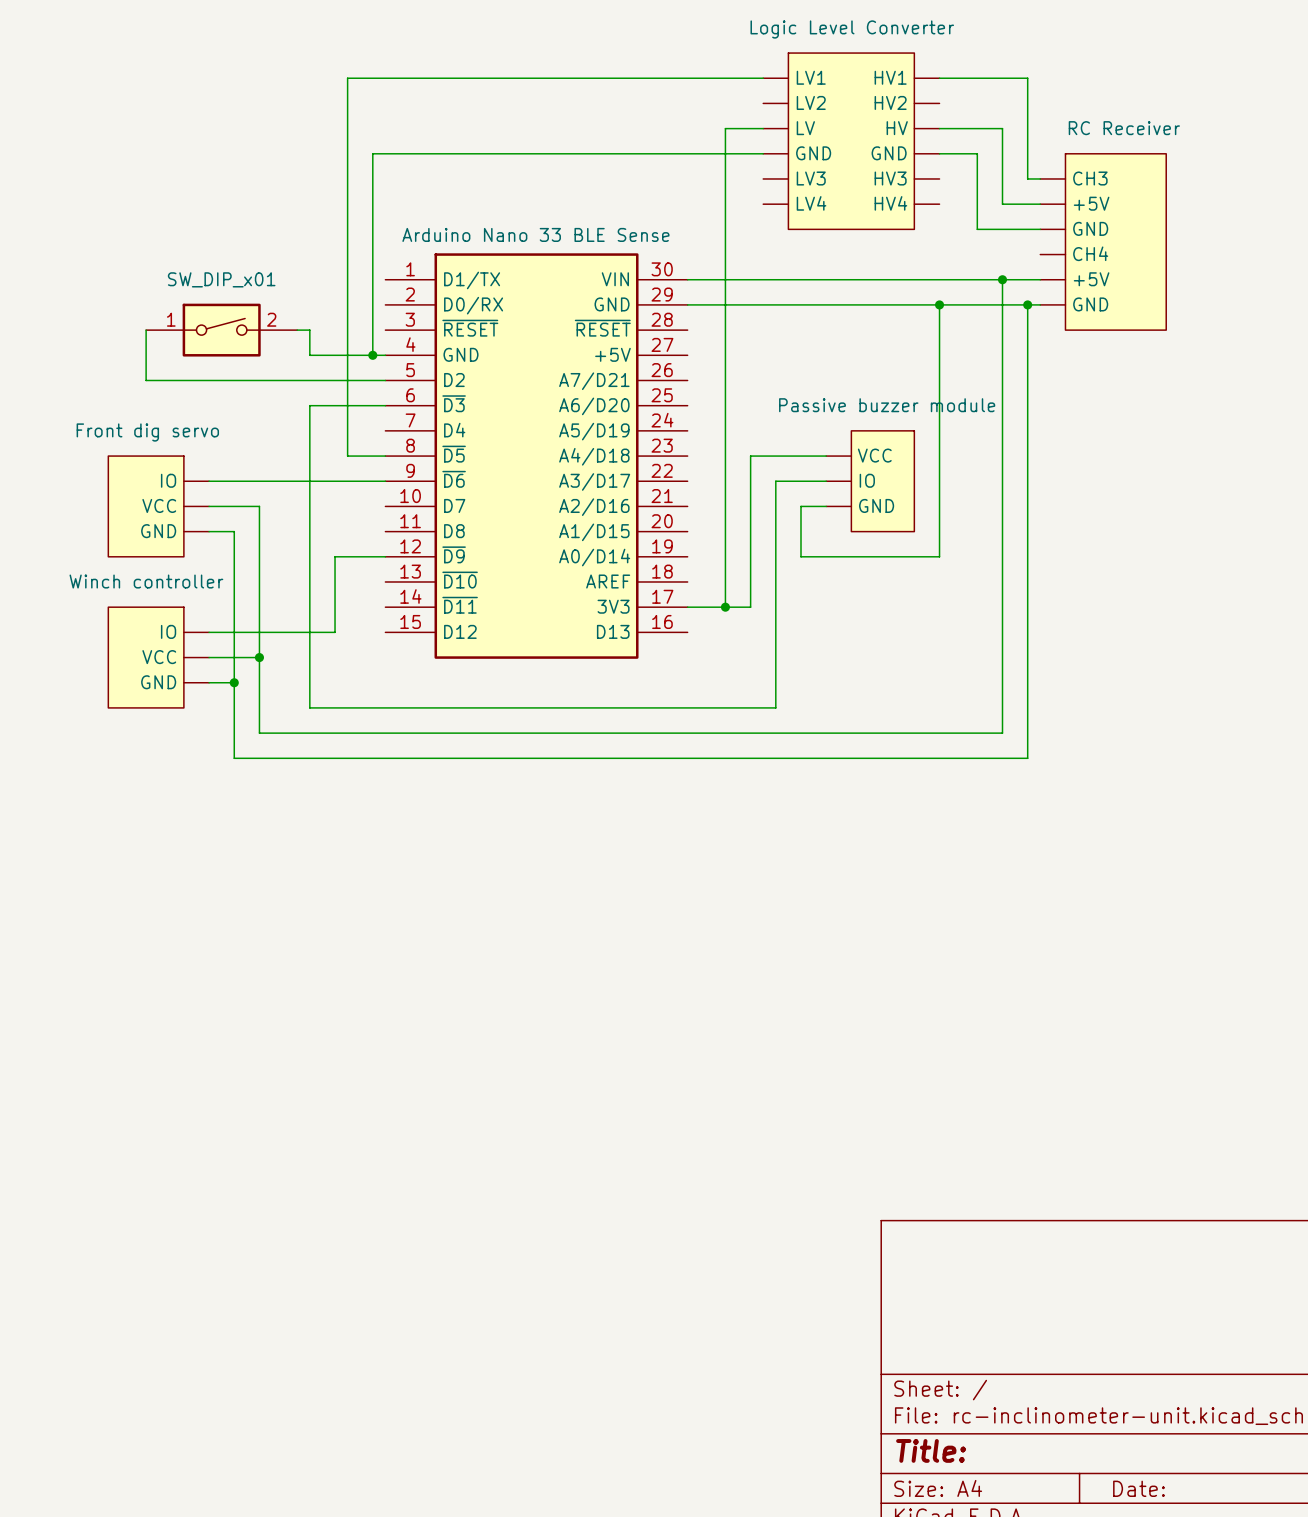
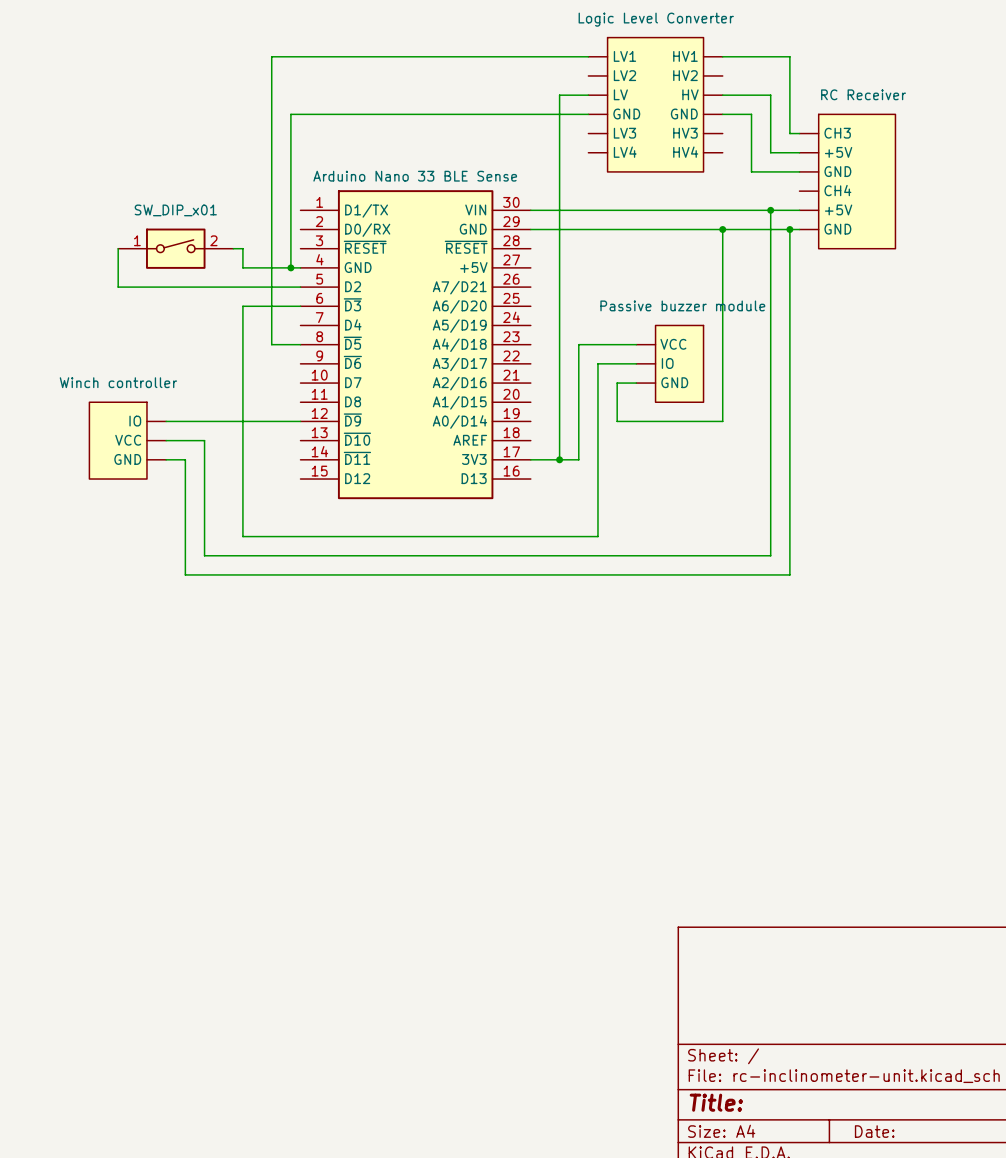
wire: (209, 481) (385, 481) -> none
part: Front dig servo (158, 506) -> none
wire: (209, 506) (259, 506) (259, 581) -> (166, 440) (204, 440)
wire: (209, 531) (234, 531) (234, 607) -> (166, 459) (185, 459)
wire: (335, 556) (335, 632) (209, 632) -> (262, 421) (166, 421)
part position: (158, 657) -> (127, 440)
wire: (209, 657) (259, 657) -> none
junction: (259, 657) -> none
wire: (209, 682) (234, 682) -> none
junction: (234, 682) -> none

